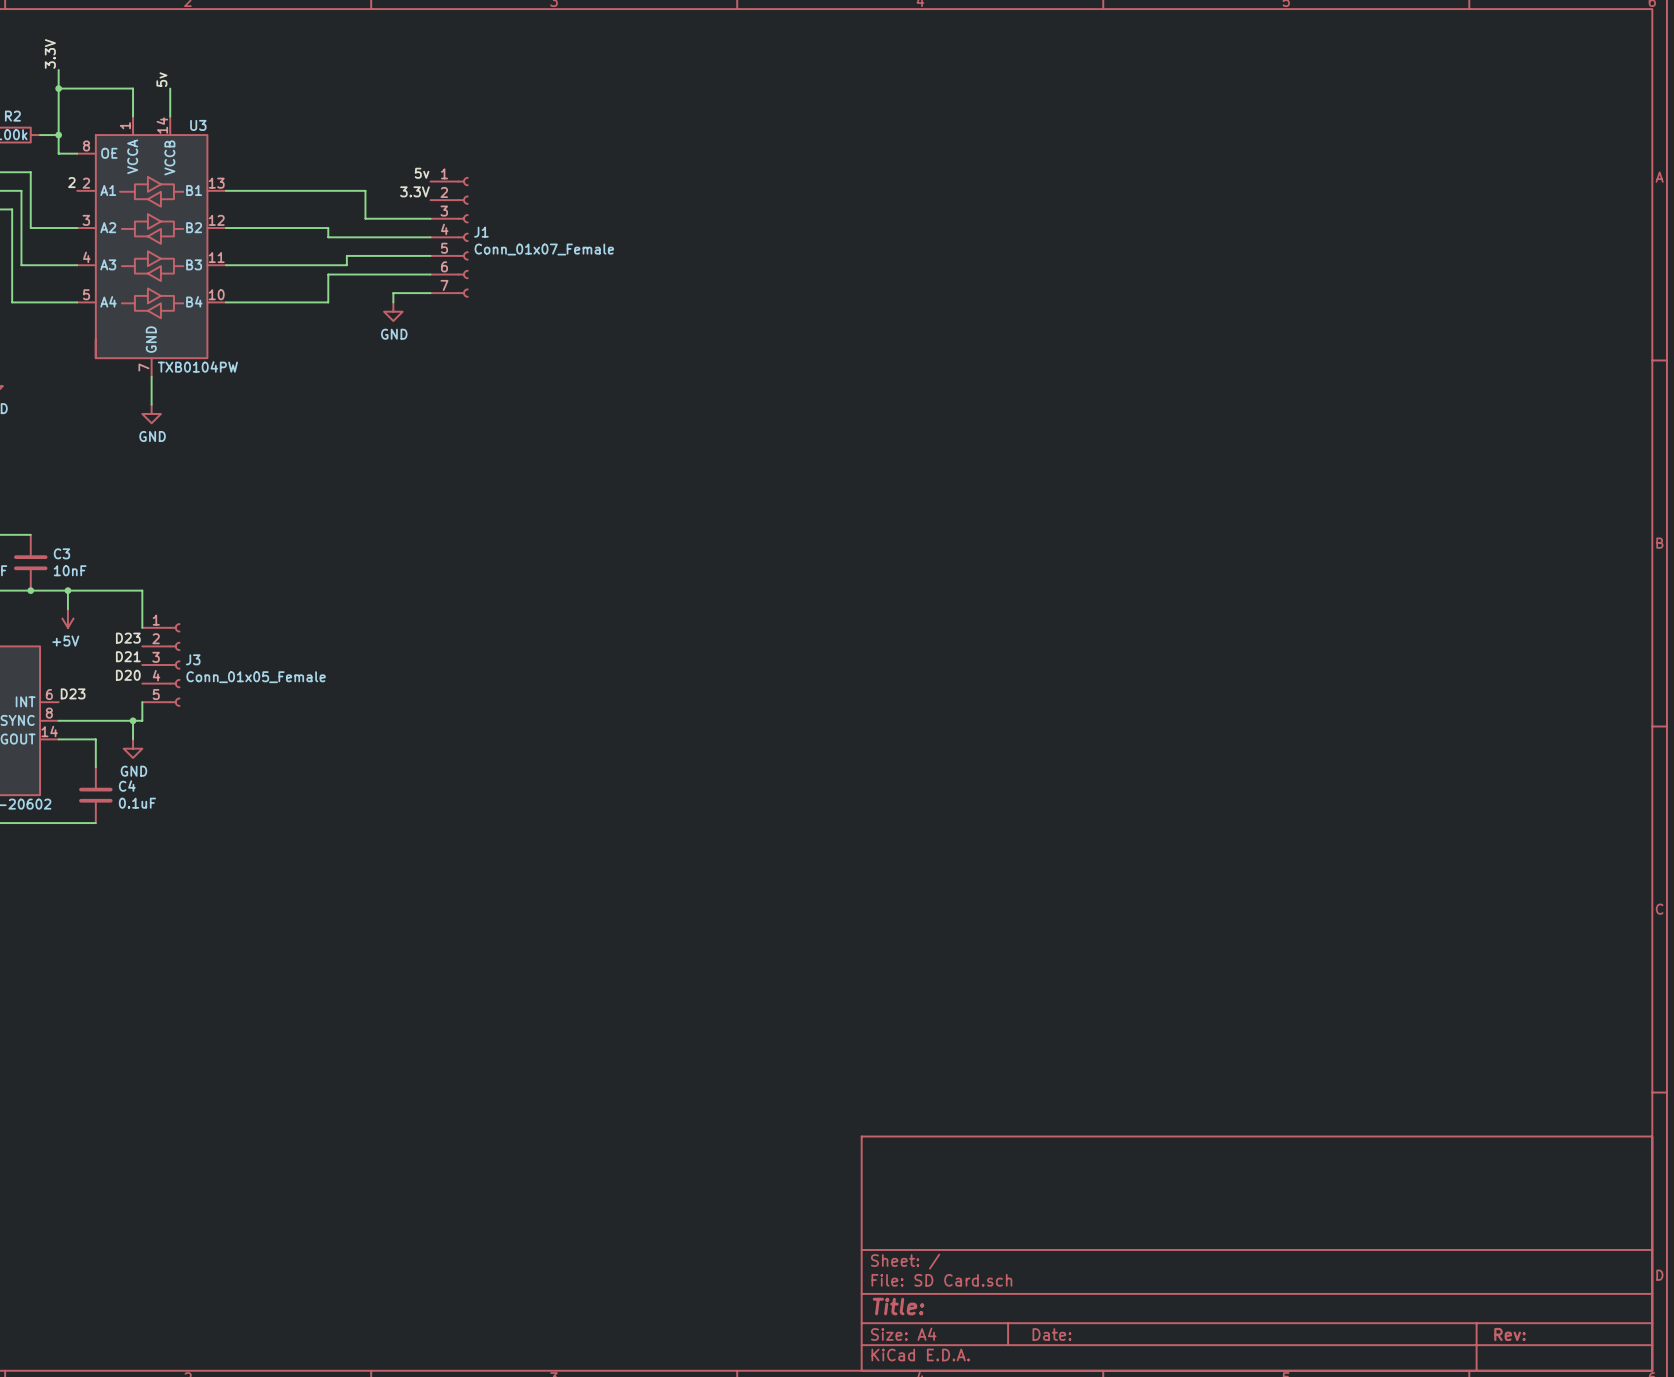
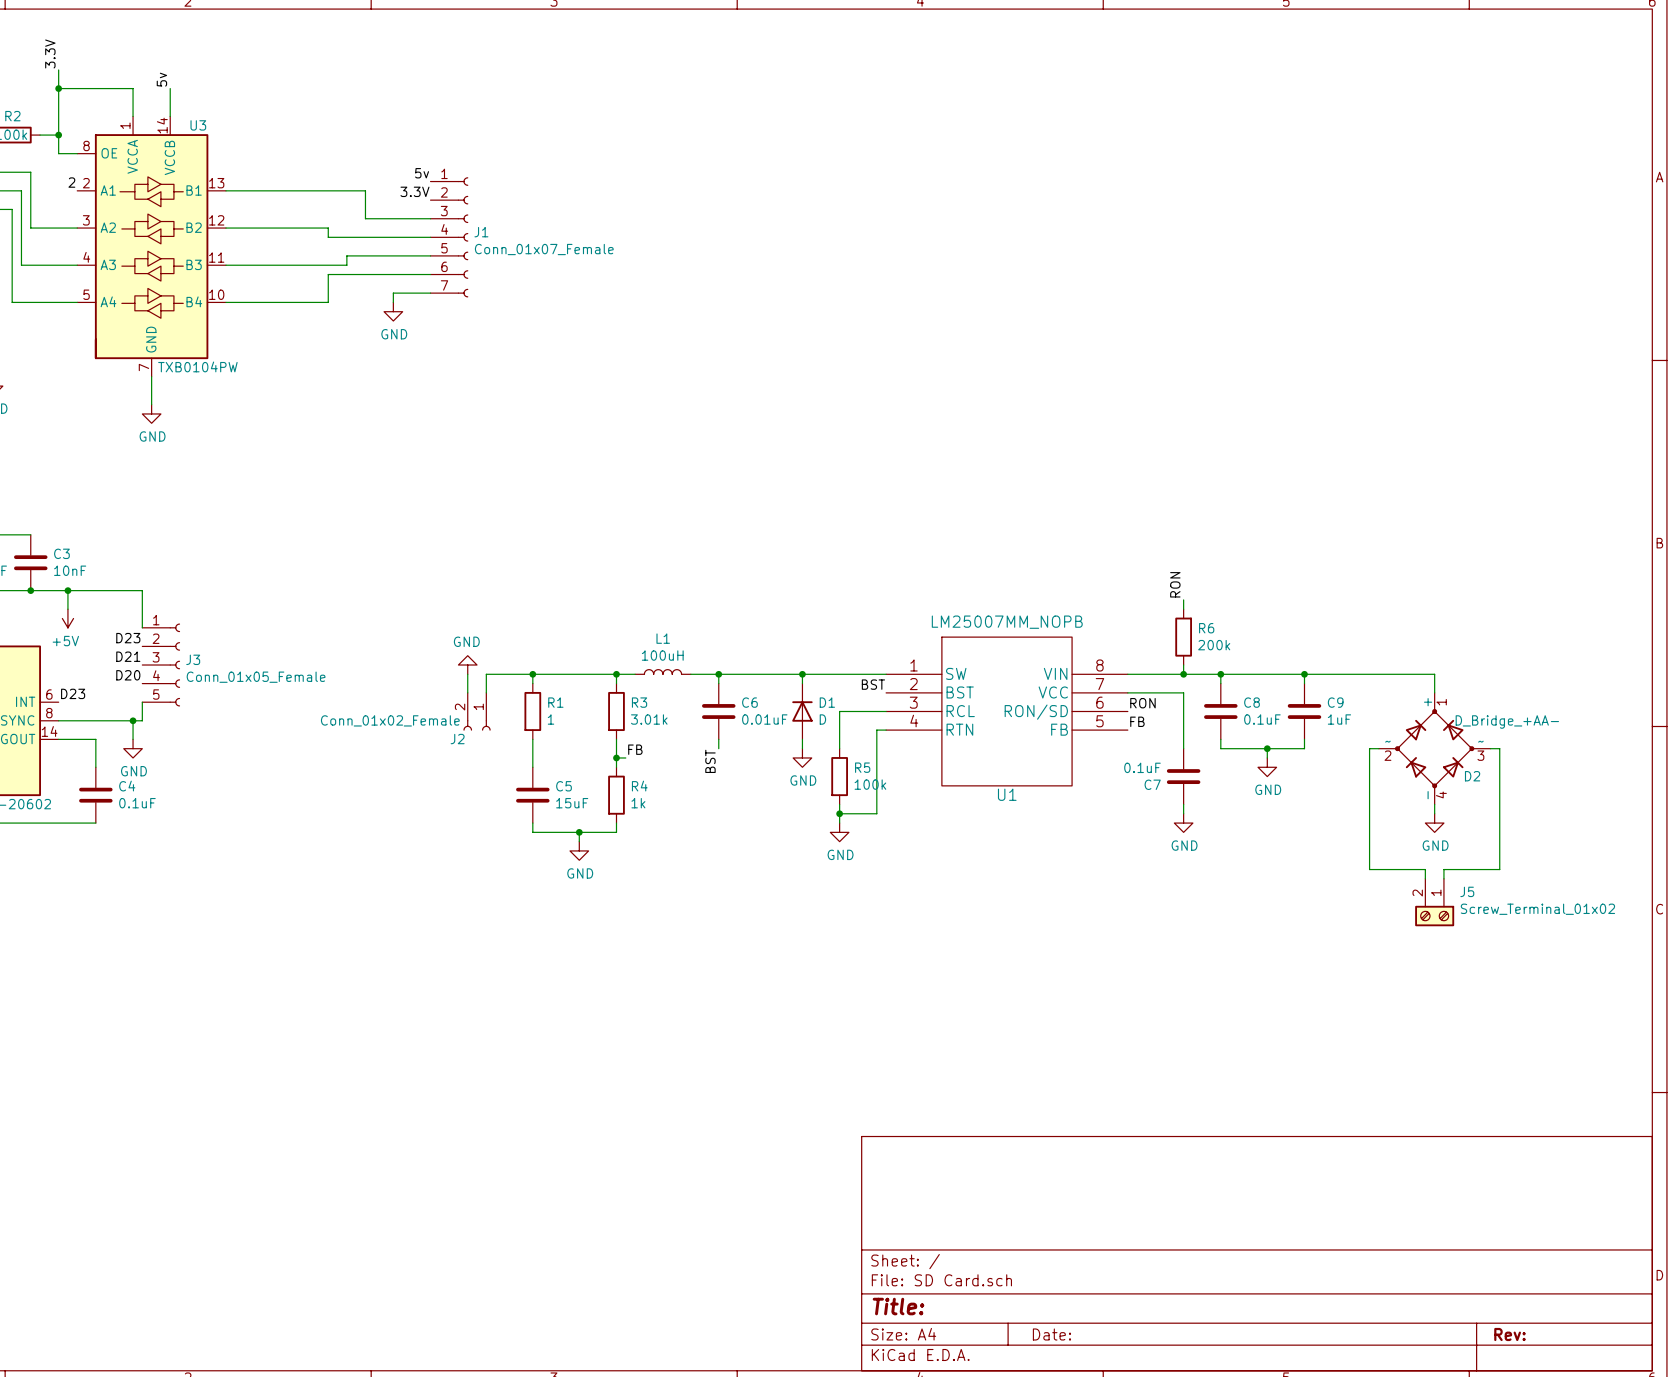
label: none -> RON (1175, 584)
wire: none -> (1183, 599) (1183, 609)
R6: none -> 200k (1183, 637)
power symbol: none -> GND (467, 665)
wire: none -> (1183, 665) (1183, 674)
L1: none -> 100uH (662, 671)
wire: none -> (467, 674) (467, 692)
wire: none -> (532, 674) (532, 683)
junction: none -> (532, 674)
wire: none -> (616, 674) (616, 683)
junction: none -> (616, 674)
wire: none -> (635, 674) (486, 674) (486, 692)
wire: none -> (690, 674) (886, 674)
wire: none -> (718, 674) (718, 683)
junction: none -> (718, 674)
wire: none -> (802, 674) (802, 683)
junction: none -> (802, 674)
wire: none -> (1127, 674) (1434, 674) (1434, 692)
junction: none -> (1183, 674)
wire: none -> (1220, 674) (1220, 683)
junction: none -> (1220, 674)
wire: none -> (1304, 674) (1304, 683)
junction: none -> (1304, 674)
label: none -> BST (873, 684)
wire: none -> (1127, 692) (1183, 692) (1183, 748)
label: none -> RON (1142, 703)
J2: none -> Conn_01x02_Female (477, 711)
R1: none -> 1 (532, 711)
R3: none -> 3.01k (616, 711)
C6: none -> 0.01uF (718, 711)
D1: none -> D (802, 711)
wire: none -> (886, 711) (839, 711) (839, 748)
U1: none -> LM25007MM_NOPB (1006, 711)
C8: none -> 0.1uF (1220, 711)
C9: none -> 1uF (1304, 711)
label: none -> FB (1137, 721)
wire: none -> (886, 730) (876, 730) (876, 813) (839, 813)
wire: none -> (532, 739) (532, 767)
wire: none -> (616, 739) (616, 767)
wire: none -> (718, 739) (718, 748)
wire: none -> (802, 739) (802, 748)
wire: none -> (1220, 739) (1220, 748) (1304, 748) (1304, 739)
wire: none -> (1267, 748) (1267, 757)
junction: none -> (1267, 748)
wire: none -> (1378, 748) (1369, 748) (1369, 869) (1425, 869) (1425, 878)
D2: none -> D_Bridge_+AA- (1434, 748)
wire: none -> (1490, 748) (1499, 748) (1499, 869) (1443, 869) (1443, 878)
label: none -> FB (635, 749)
wire: none -> (616, 757) (625, 757)
junction: none -> (616, 757)
power symbol: none -> GND (802, 757)
label: none -> BST (710, 761)
power symbol: none -> GND (1267, 767)
R5: none -> 100k (839, 776)
C7: none -> 0.1uF (1183, 776)
C5: none -> 15uF (532, 795)
R4: none -> 1k (616, 795)
wire: none -> (839, 804) (839, 823)
wire: none -> (1183, 804) (1183, 813)
wire: none -> (1434, 804) (1434, 813)
junction: none -> (839, 813)
wire: none -> (532, 823) (532, 832) (616, 832) (616, 823)
power symbol: none -> GND (1183, 823)
power symbol: none -> GND (1434, 823)
wire: none -> (579, 832) (579, 841)
junction: none -> (579, 832)
power symbol: none -> GND (839, 832)
power symbol: none -> GND (579, 850)
J5: none -> Screw_Terminal_01x02 (1434, 902)

